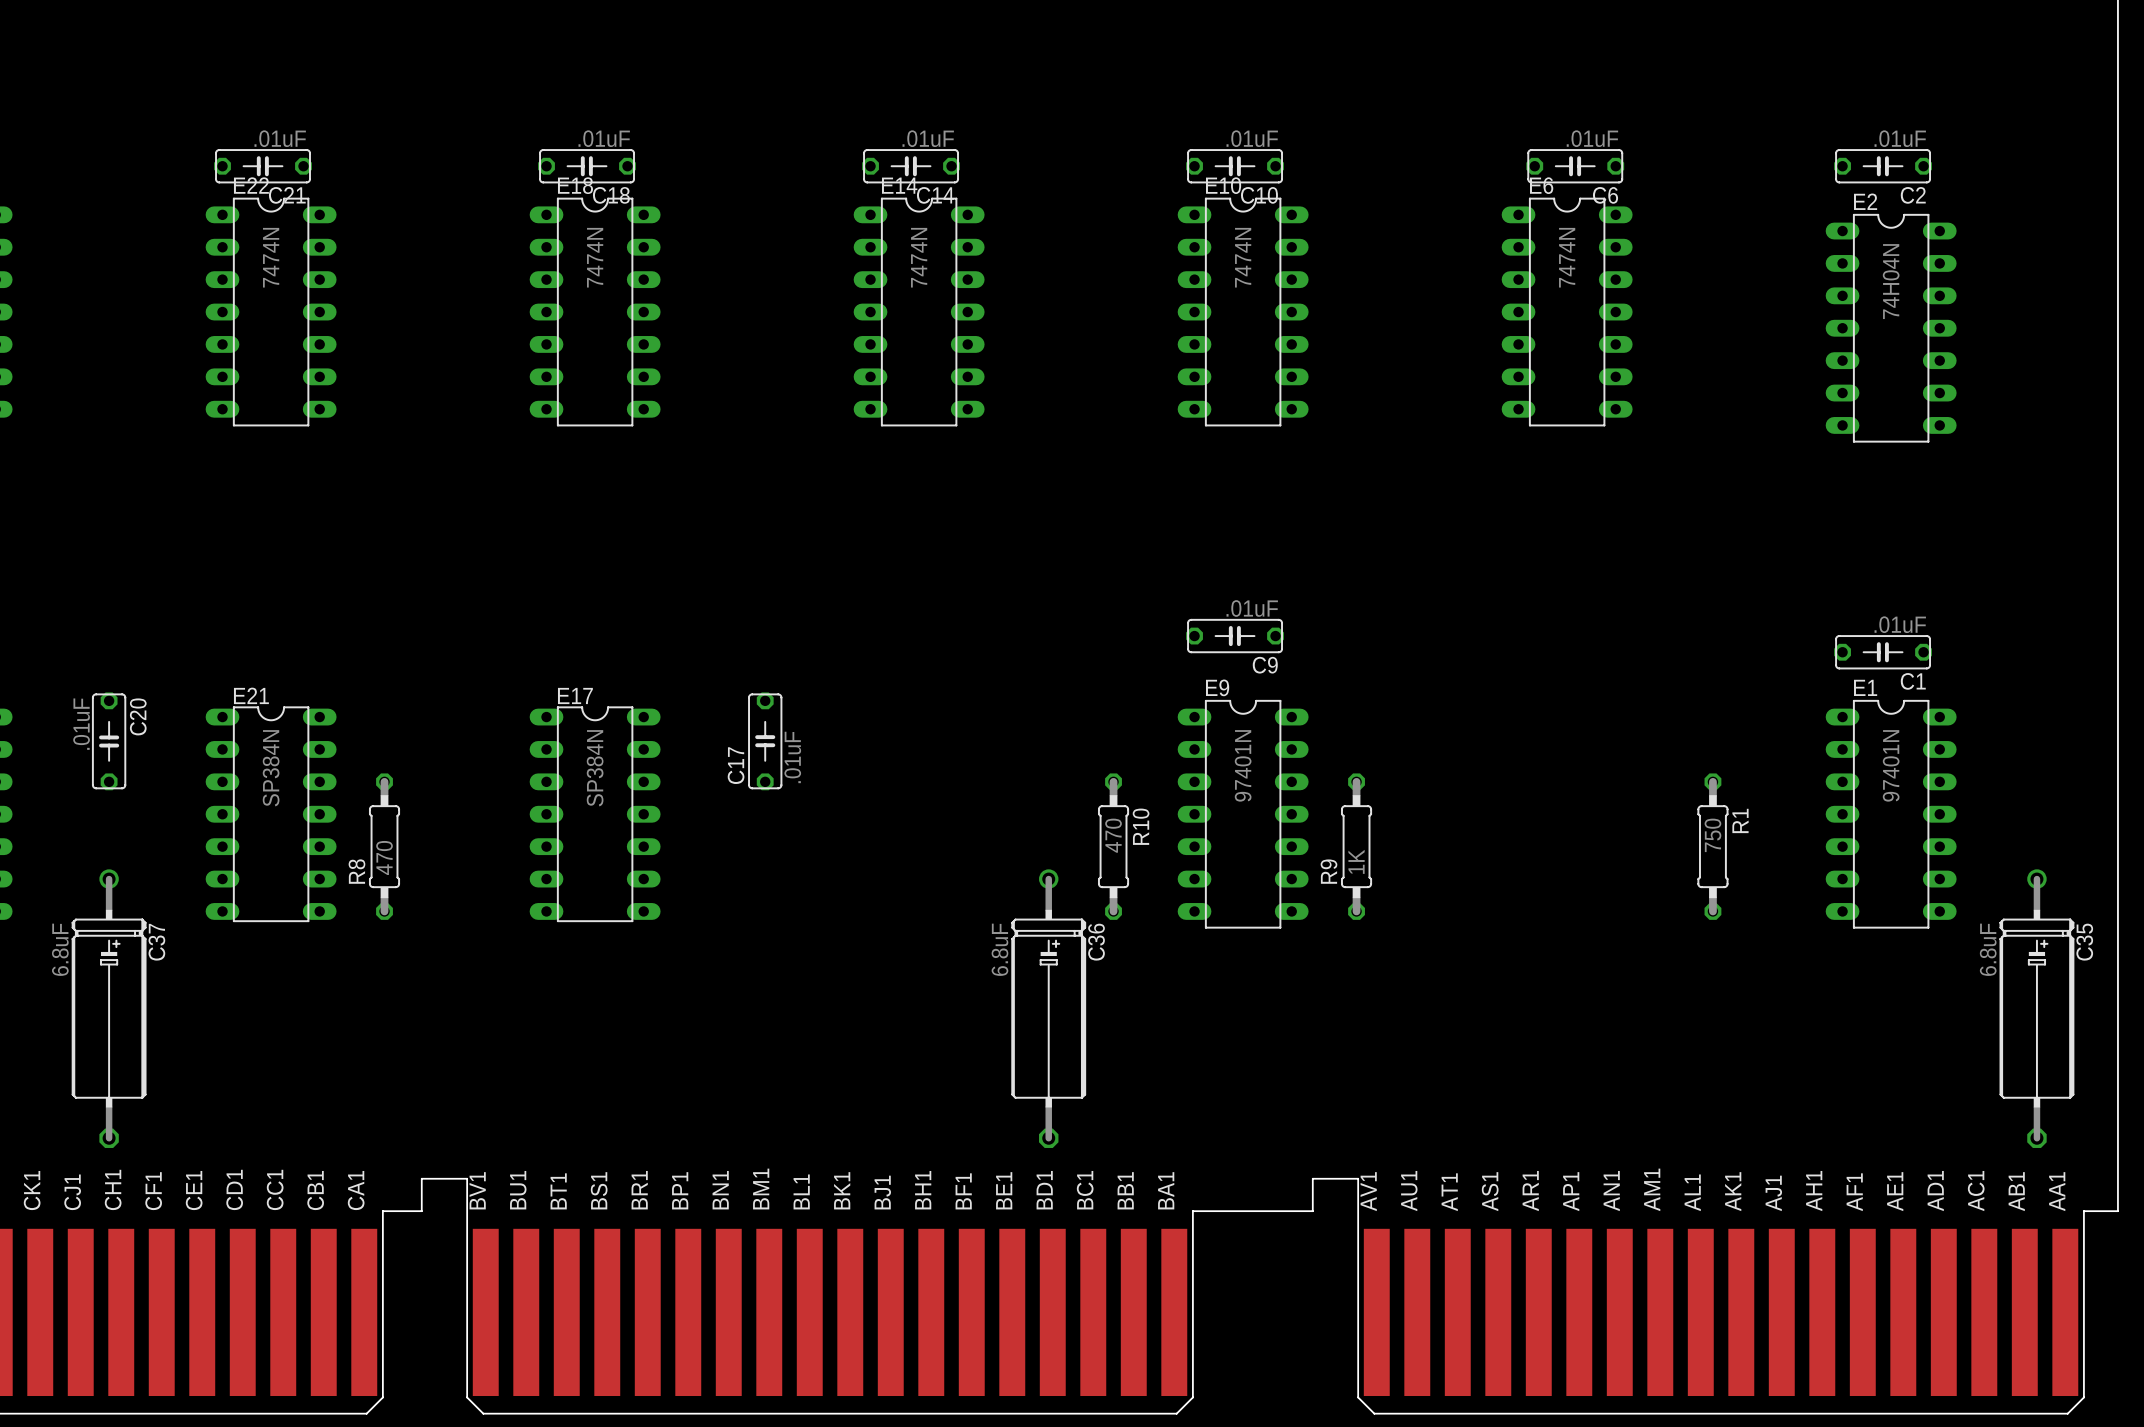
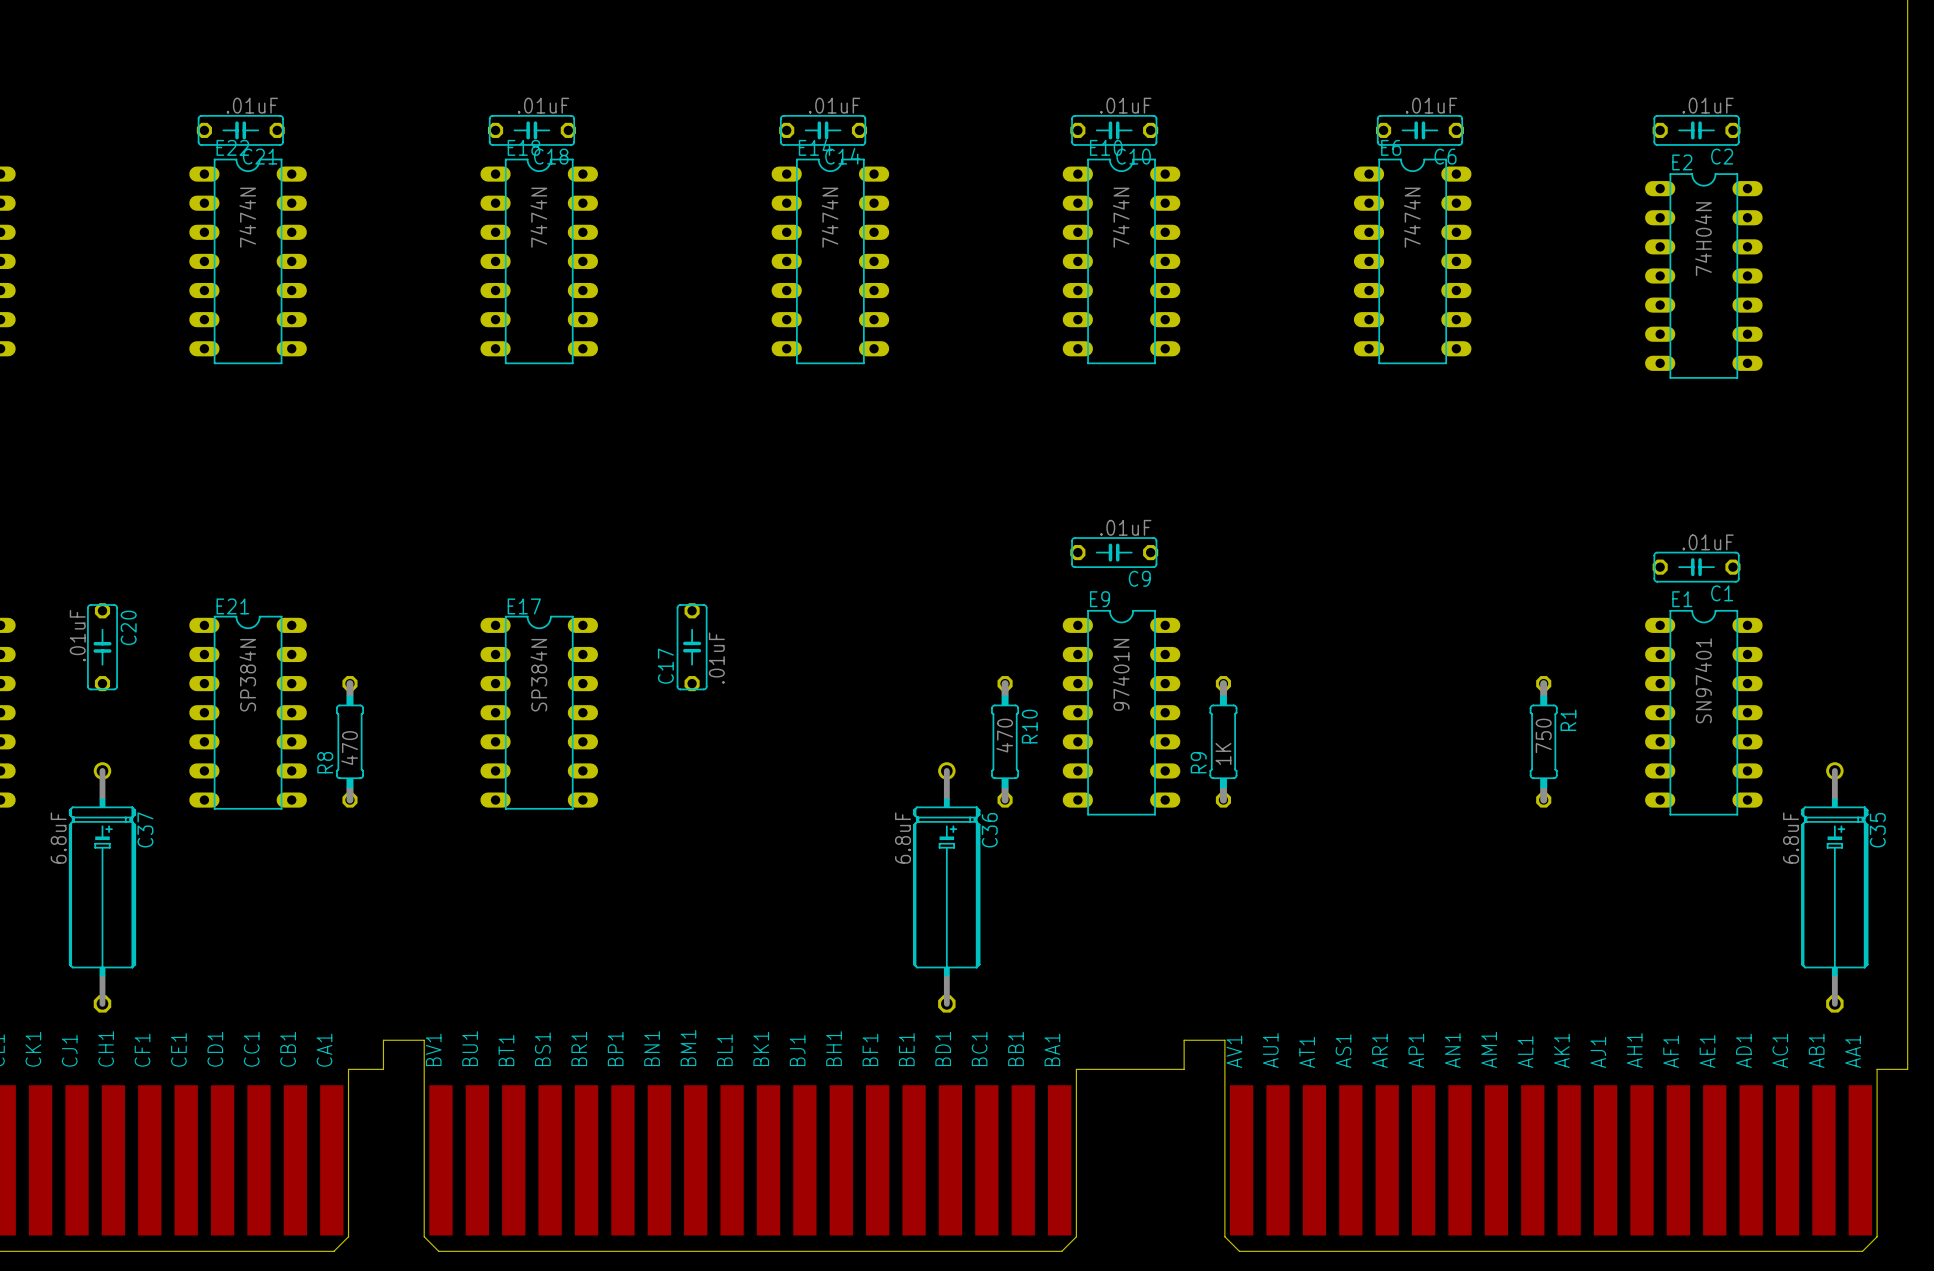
E1 value: 97401N (1891, 765) -> SN97401 (1703, 680)

